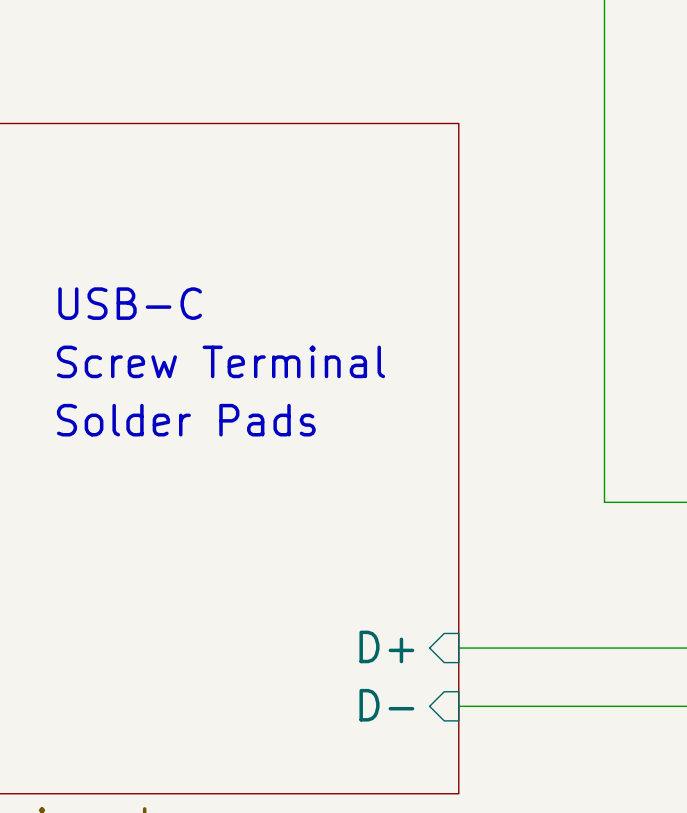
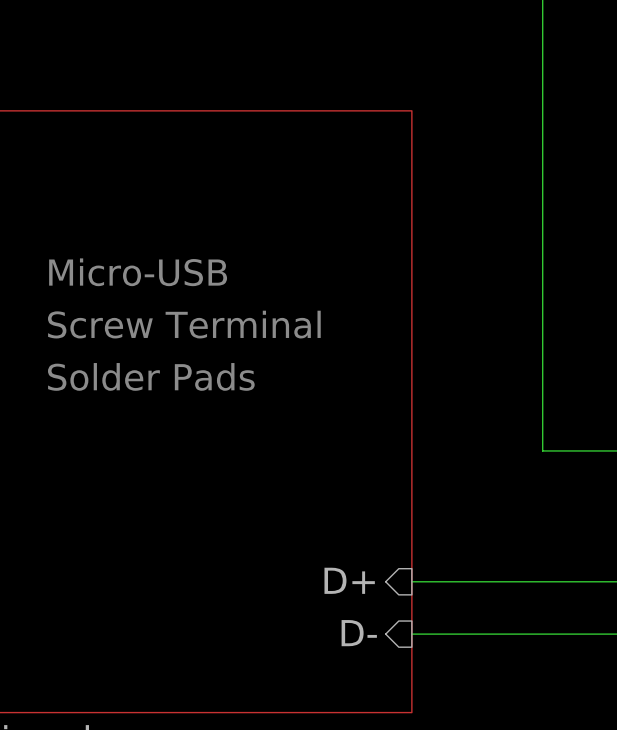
text: USB-C (130, 303) -> Micro-USB (138, 272)

